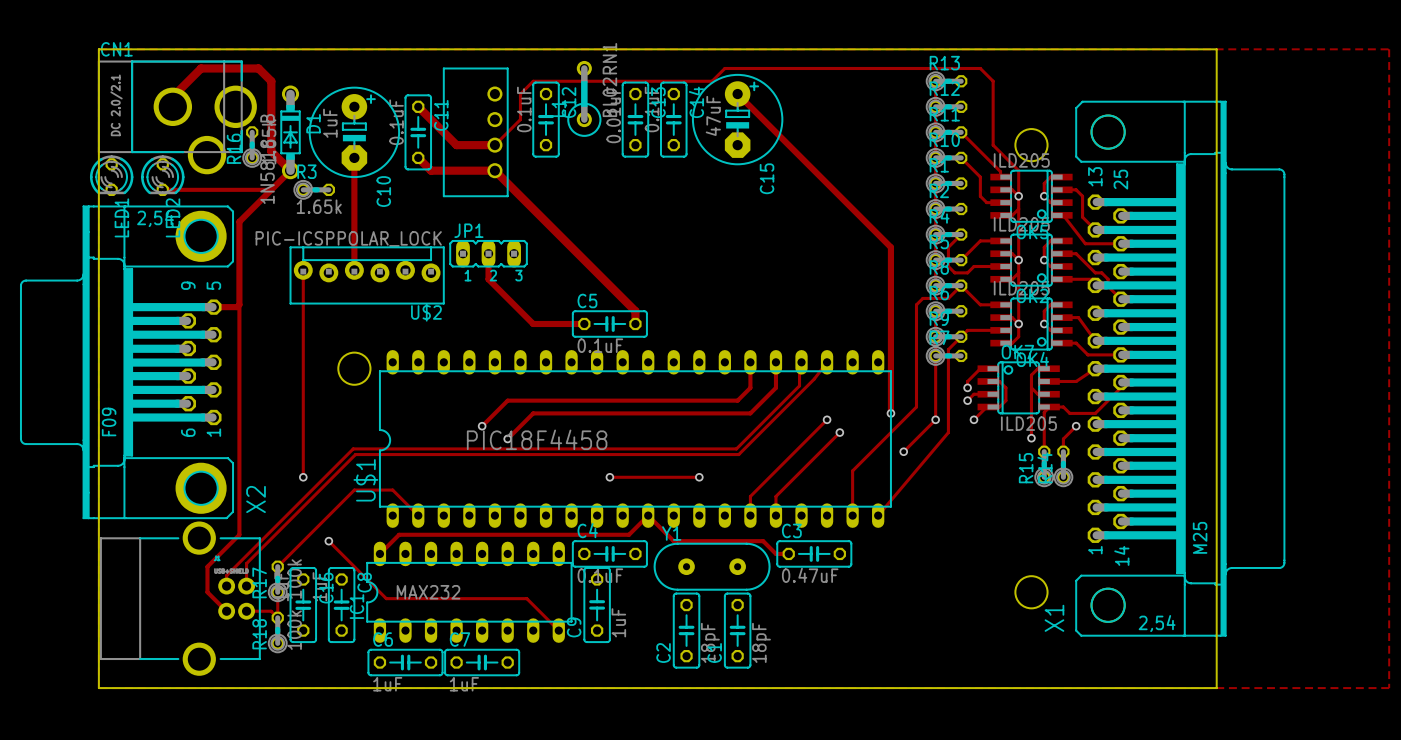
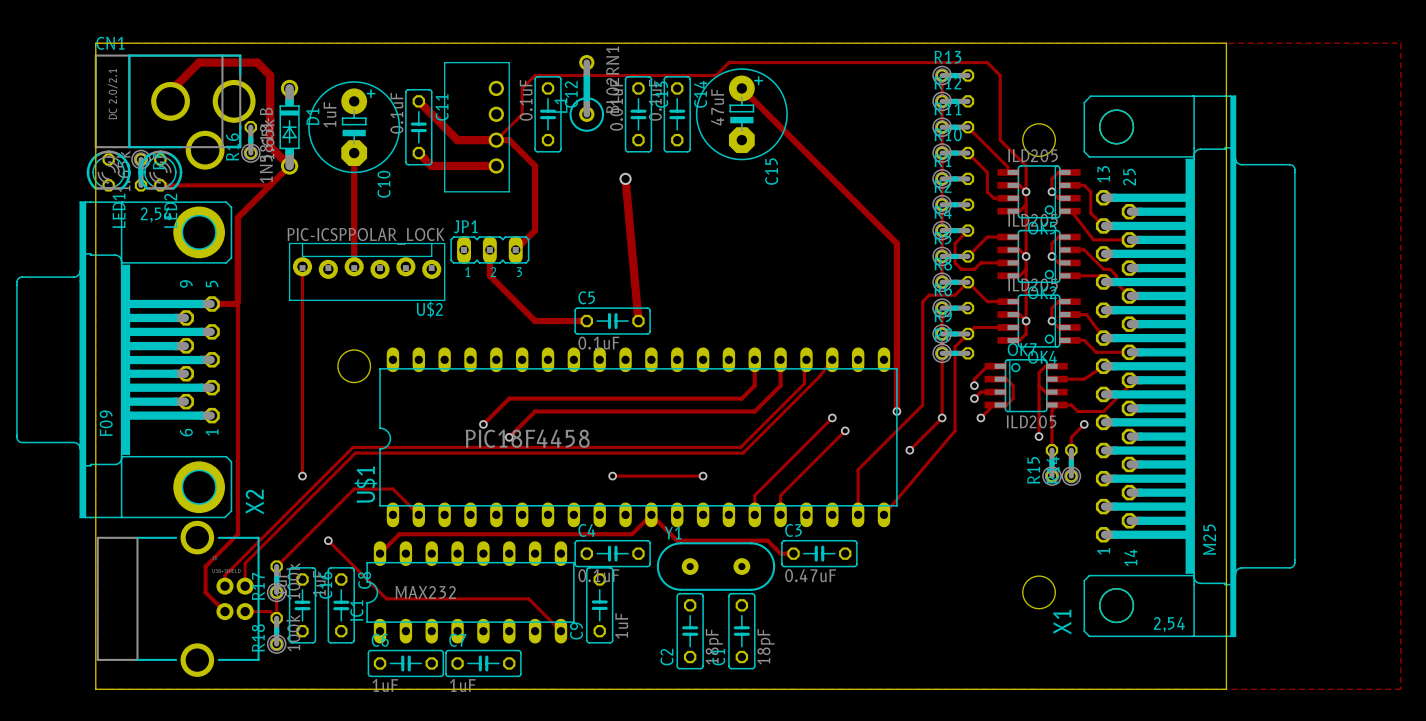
track: none -> (496, 140) (509, 140) (535, 165) (535, 230) (515, 249)
track: (494, 170) (635, 311) (635, 323) -> (625, 178) (638, 321)
via: none -> (625, 178)
R3 rotation: 0° (314, 189) -> 90° clockwise (140, 170)
R3 position: (314, 189) -> (140, 170)

